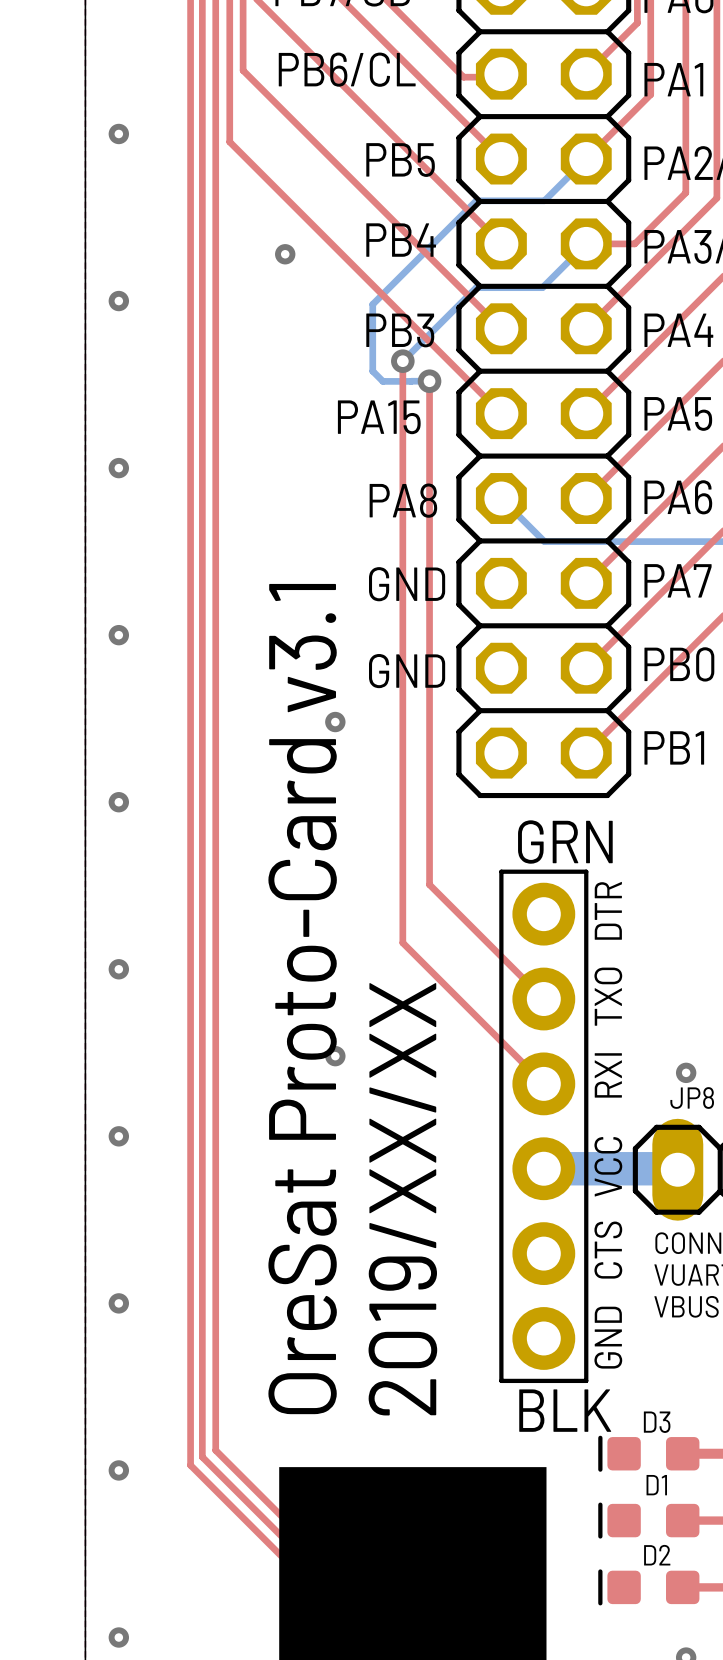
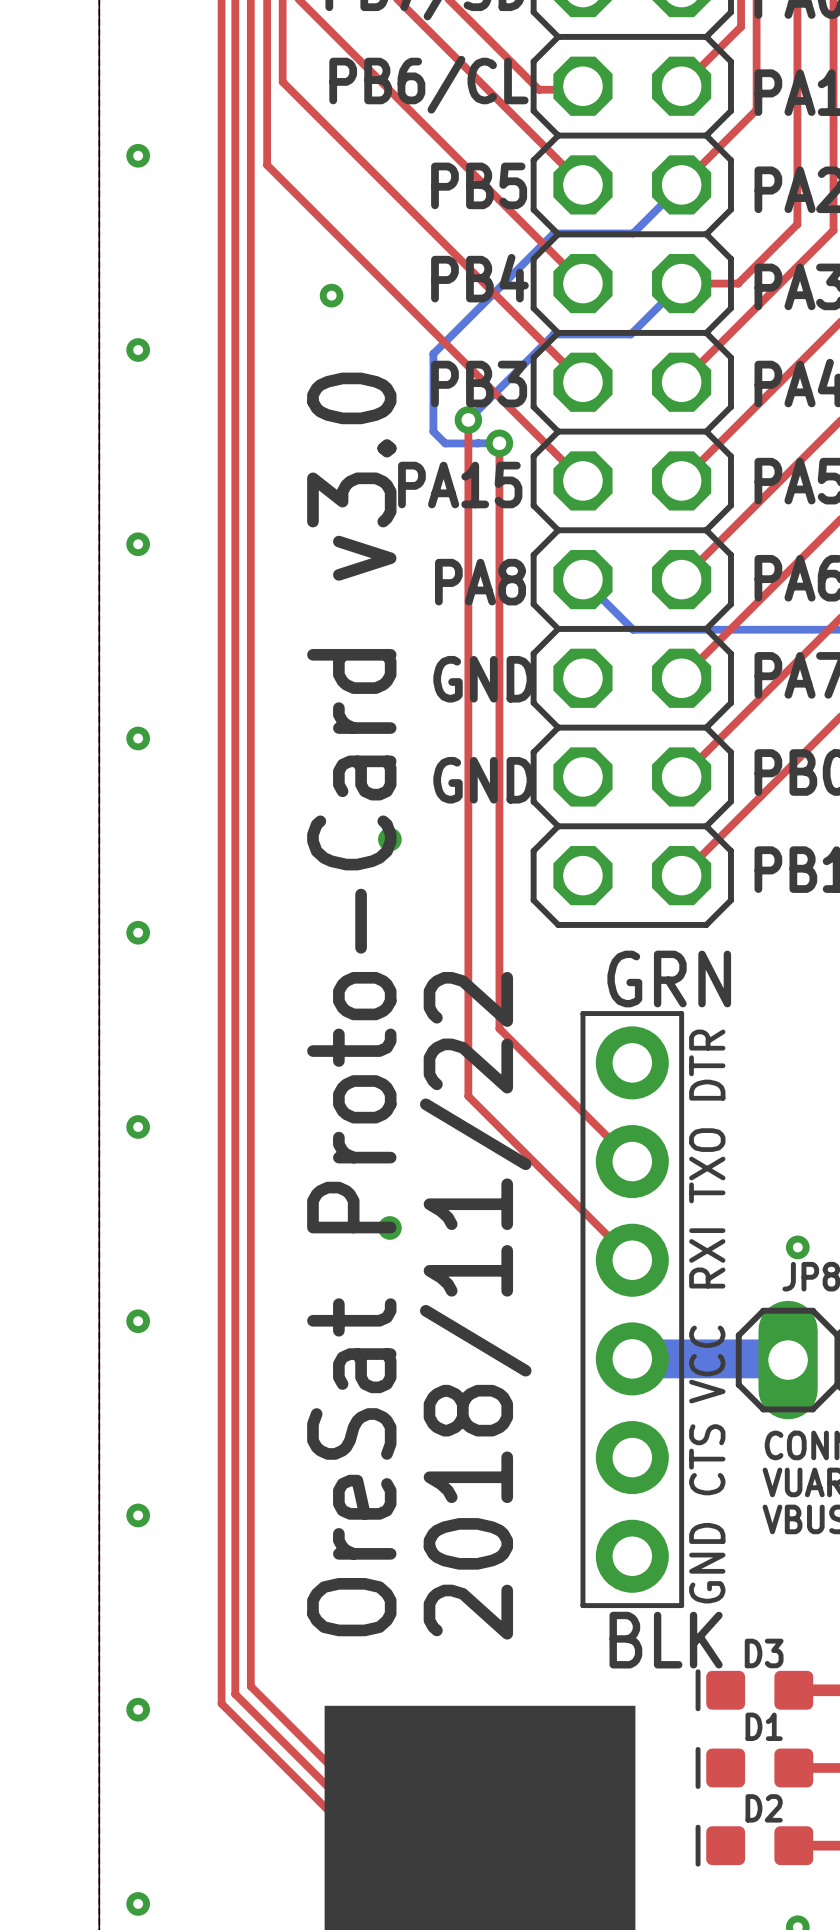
text: OreSat Proto-Card v3.1 (302, 999) -> OreSat Proto-Card v3.0 (351, 1004)
text: 2019/XX/XX (402, 1199) -> 2018/11/22 (475, 1305)

